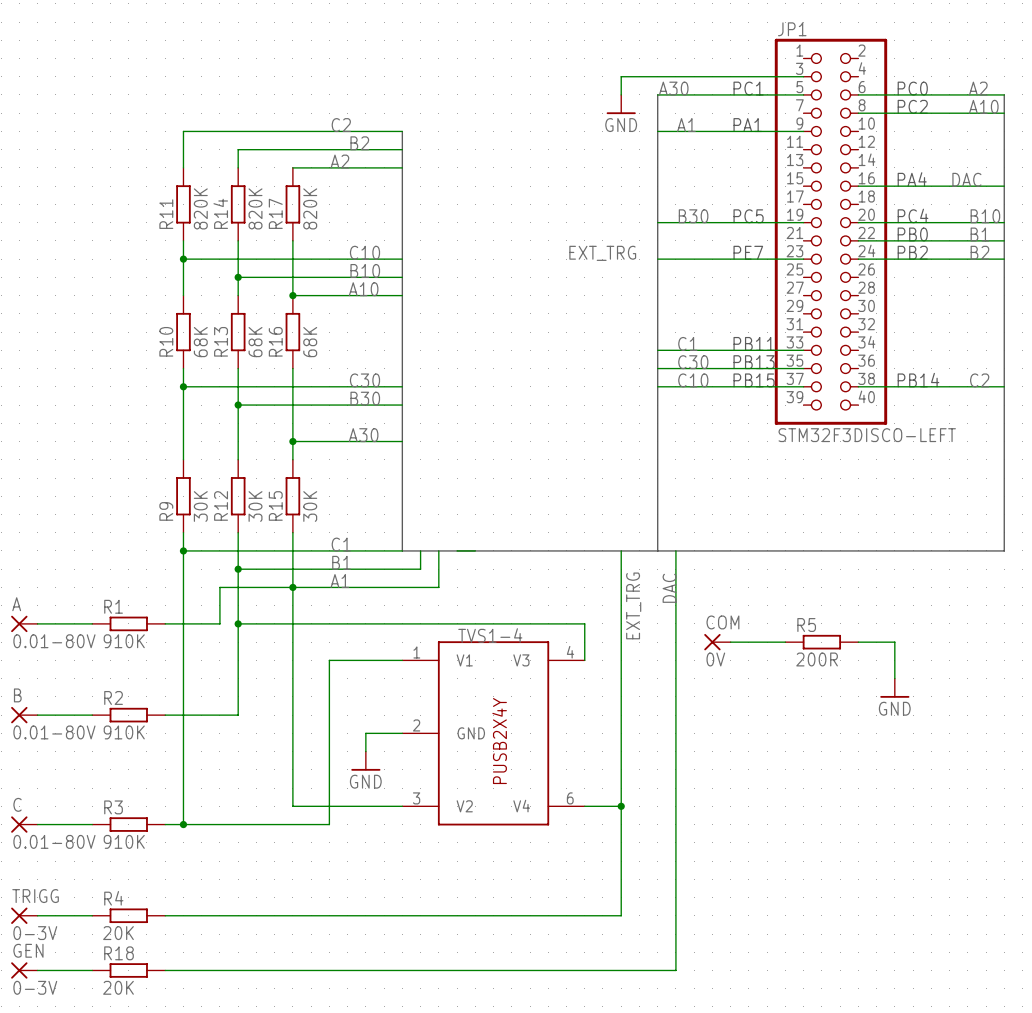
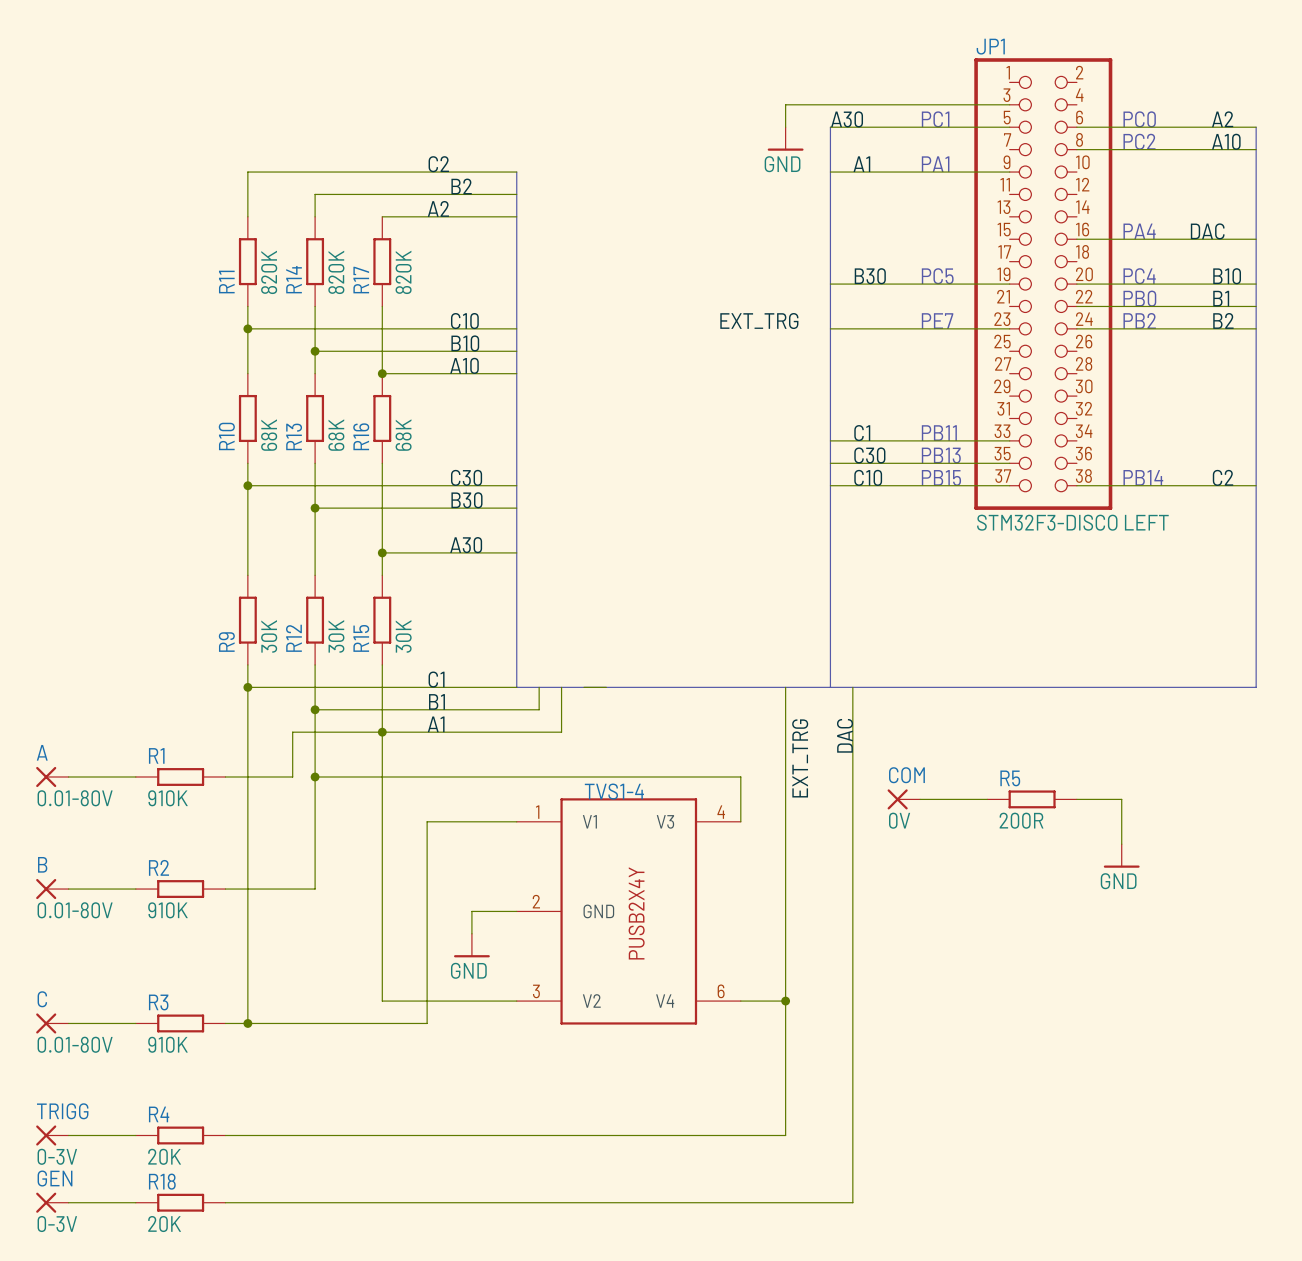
JP1 symbol: [774, 38, 888, 425] -> [974, 58, 1113, 510]
JP1 value: STM32F3DISCO-LEFT (867, 435) -> STM32F3-DISCO LEFT (1072, 522)

